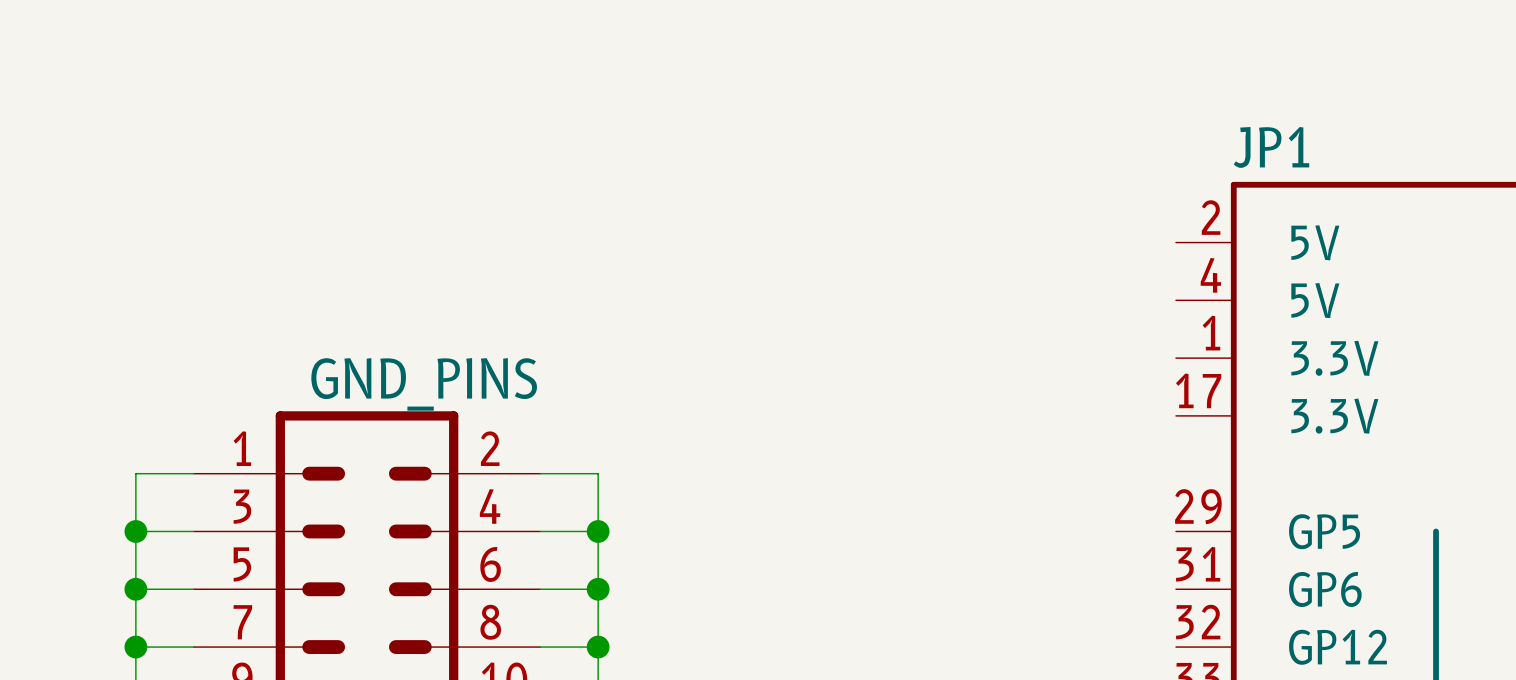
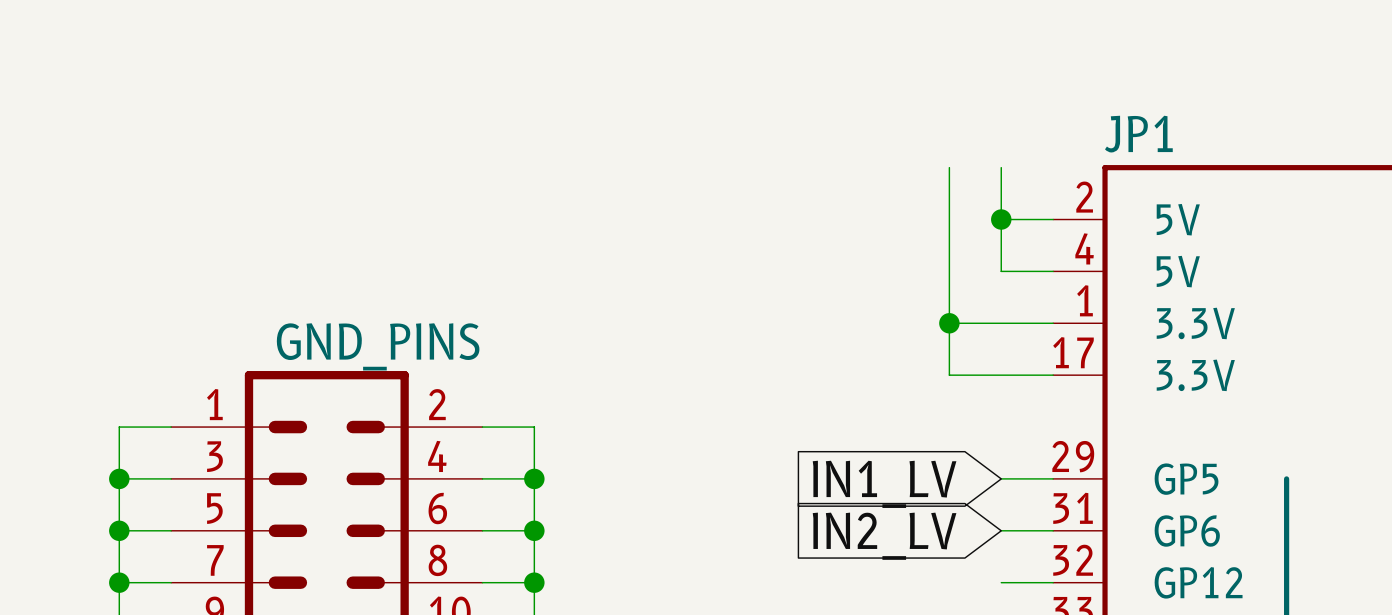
wire: none -> (949, 167) (949, 375) (1053, 375)
wire: none -> (1001, 167) (1001, 271) (1053, 271)
wire: none -> (1001, 219) (1053, 219)
junction: none -> (1001, 219)
wire: none -> (949, 323) (1053, 323)
junction: none -> (949, 323)
wire: none -> (1001, 478) (1053, 478)
global label: none -> IN1_LV (884, 484)
wire: none -> (1001, 530) (1053, 530)
global label: none -> IN2_LV (884, 536)
wire: none -> (1001, 582) (1053, 582)

